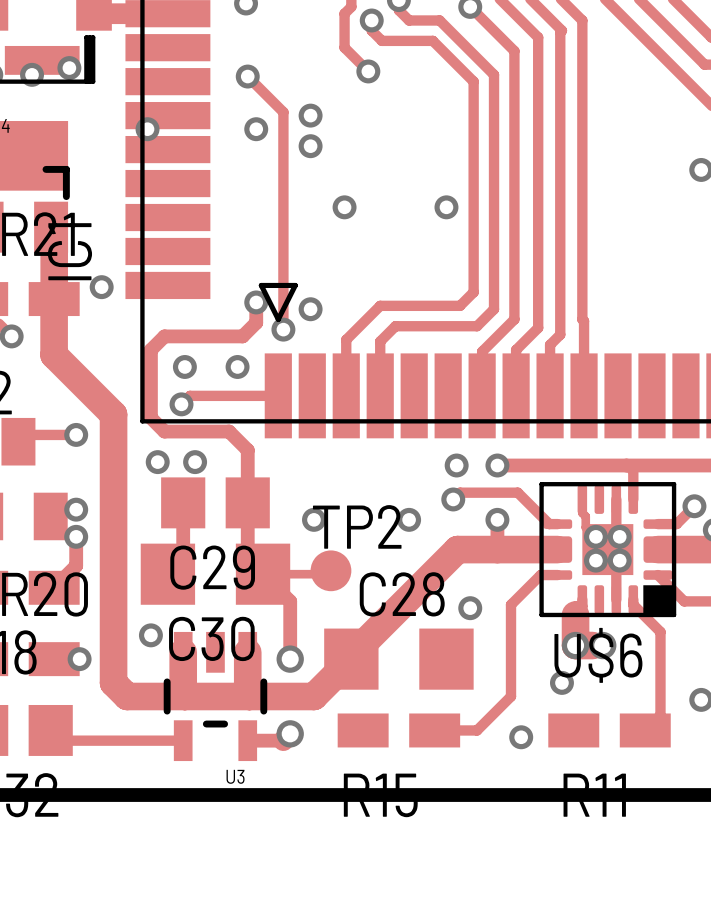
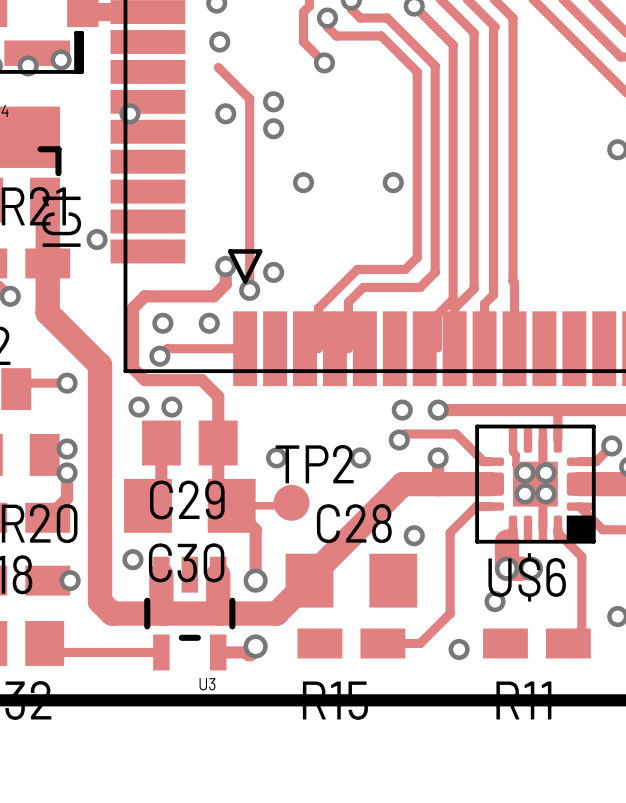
via position: (247, 76) -> (219, 41)
via position: (101, 287) -> (97, 239)
track: (405, 305) (380, 305) (346, 339) (346, 395) -> (357, 269) (318, 308) (318, 348)
track: (514, 319) (482, 351) (482, 395) -> (453, 281) (453, 299) (438, 314) (438, 348)
track: (412, 326) (395, 326) (380, 341) (380, 395) -> (363, 287) (348, 302) (348, 348)

